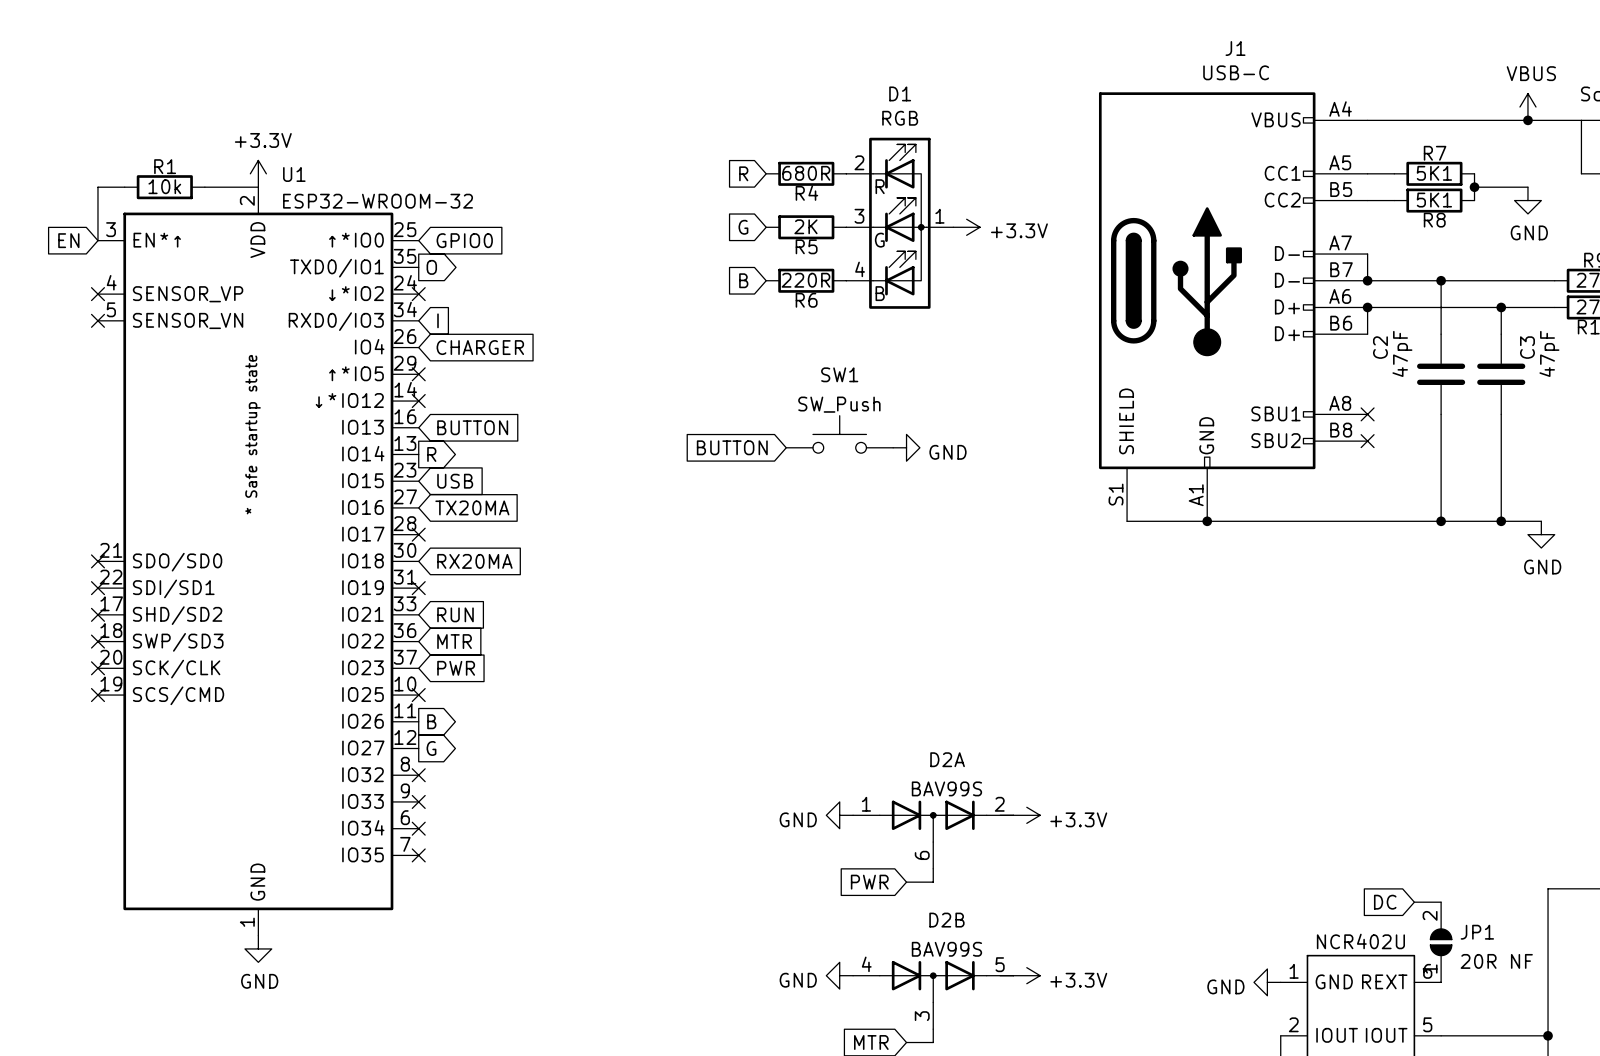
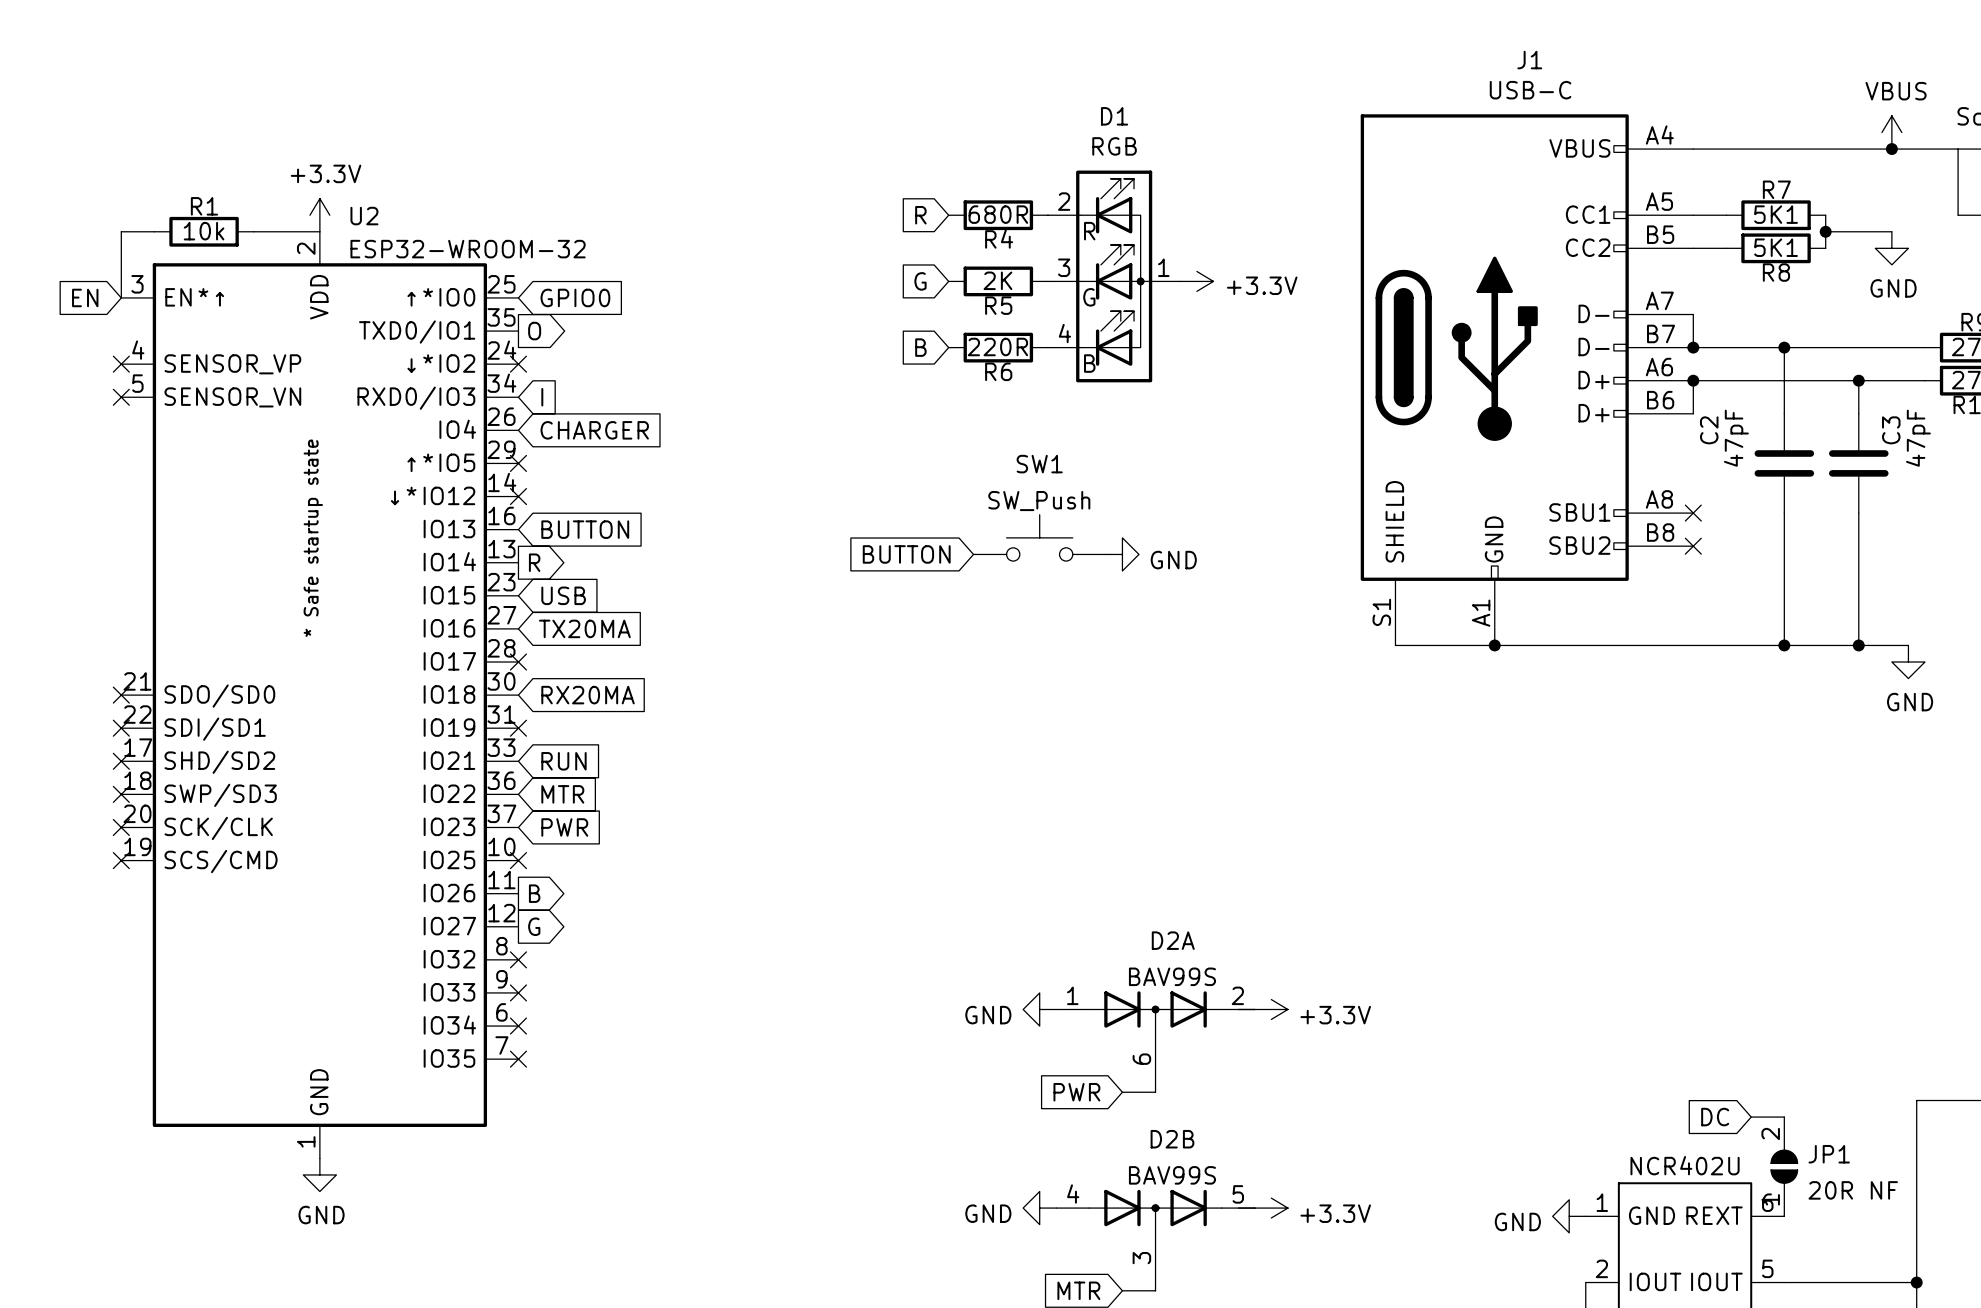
U1 name: U1 (294, 174) -> U2 (364, 216)

